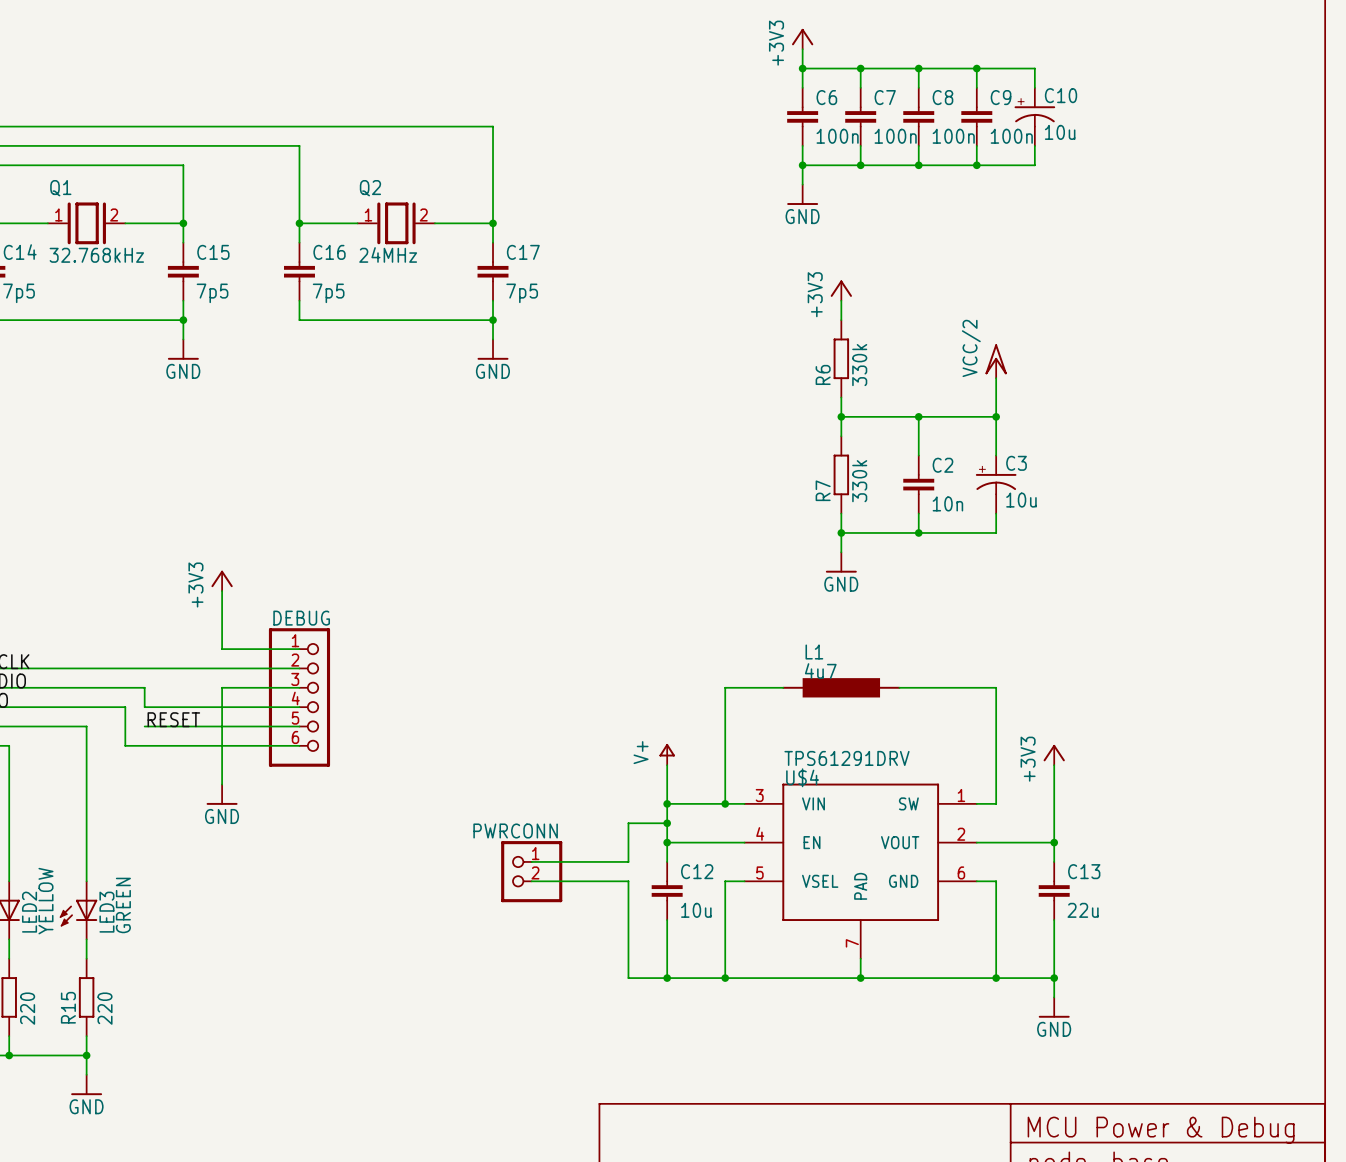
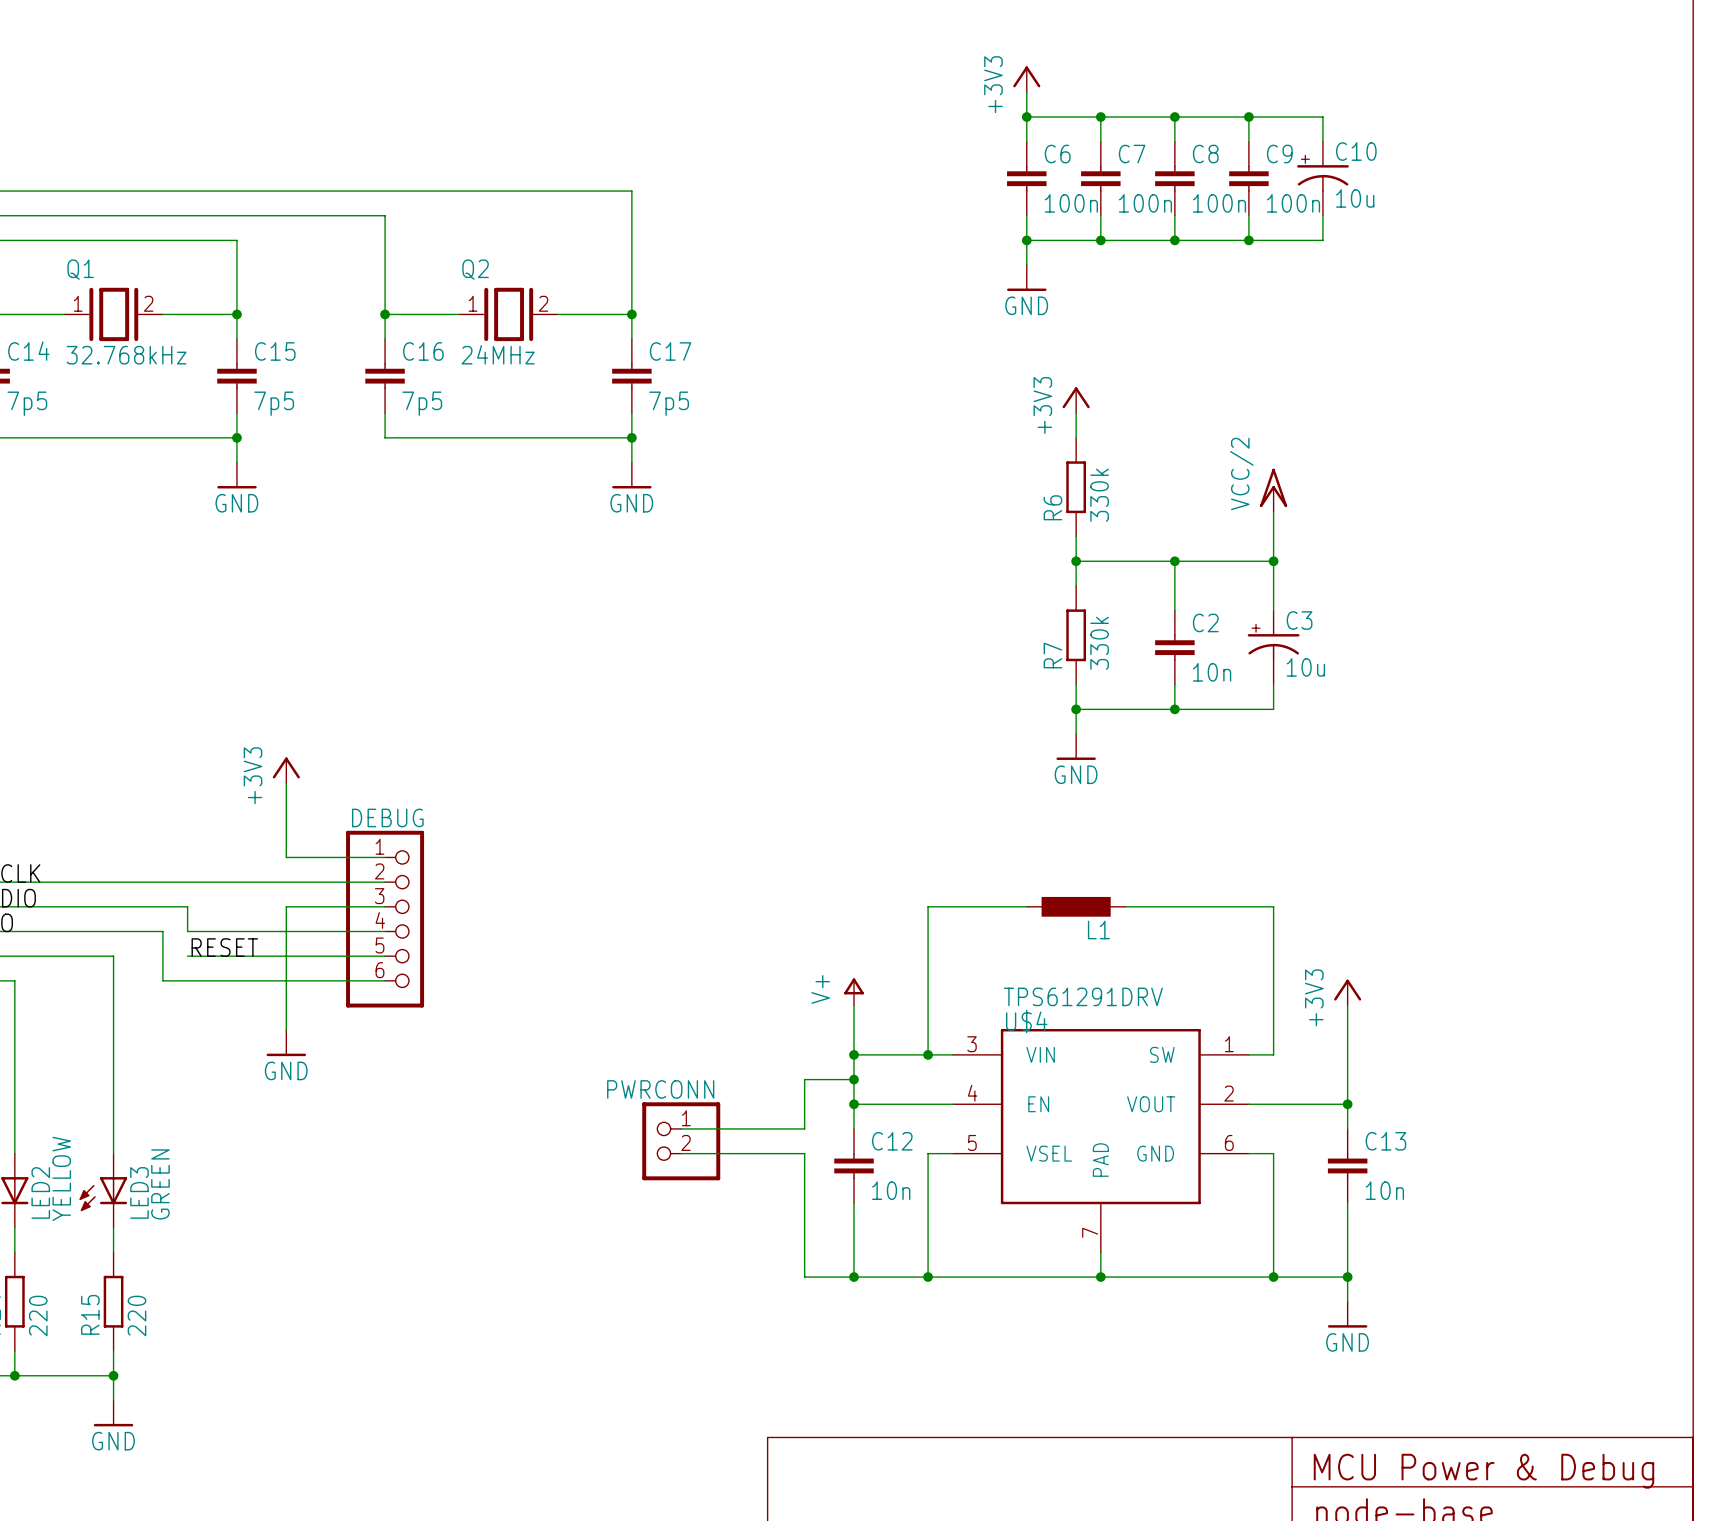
L1 name position: L1 (814, 651) -> L1 (1098, 930)
L1 value: 4u7 (820, 671) -> none
L1 symbol: [782, 678, 901, 698] -> [1026, 896, 1126, 917]
C12 value: 10u (696, 910) -> 10n (891, 1190)
C13 value: 22u (1083, 910) -> 10n (1384, 1190)

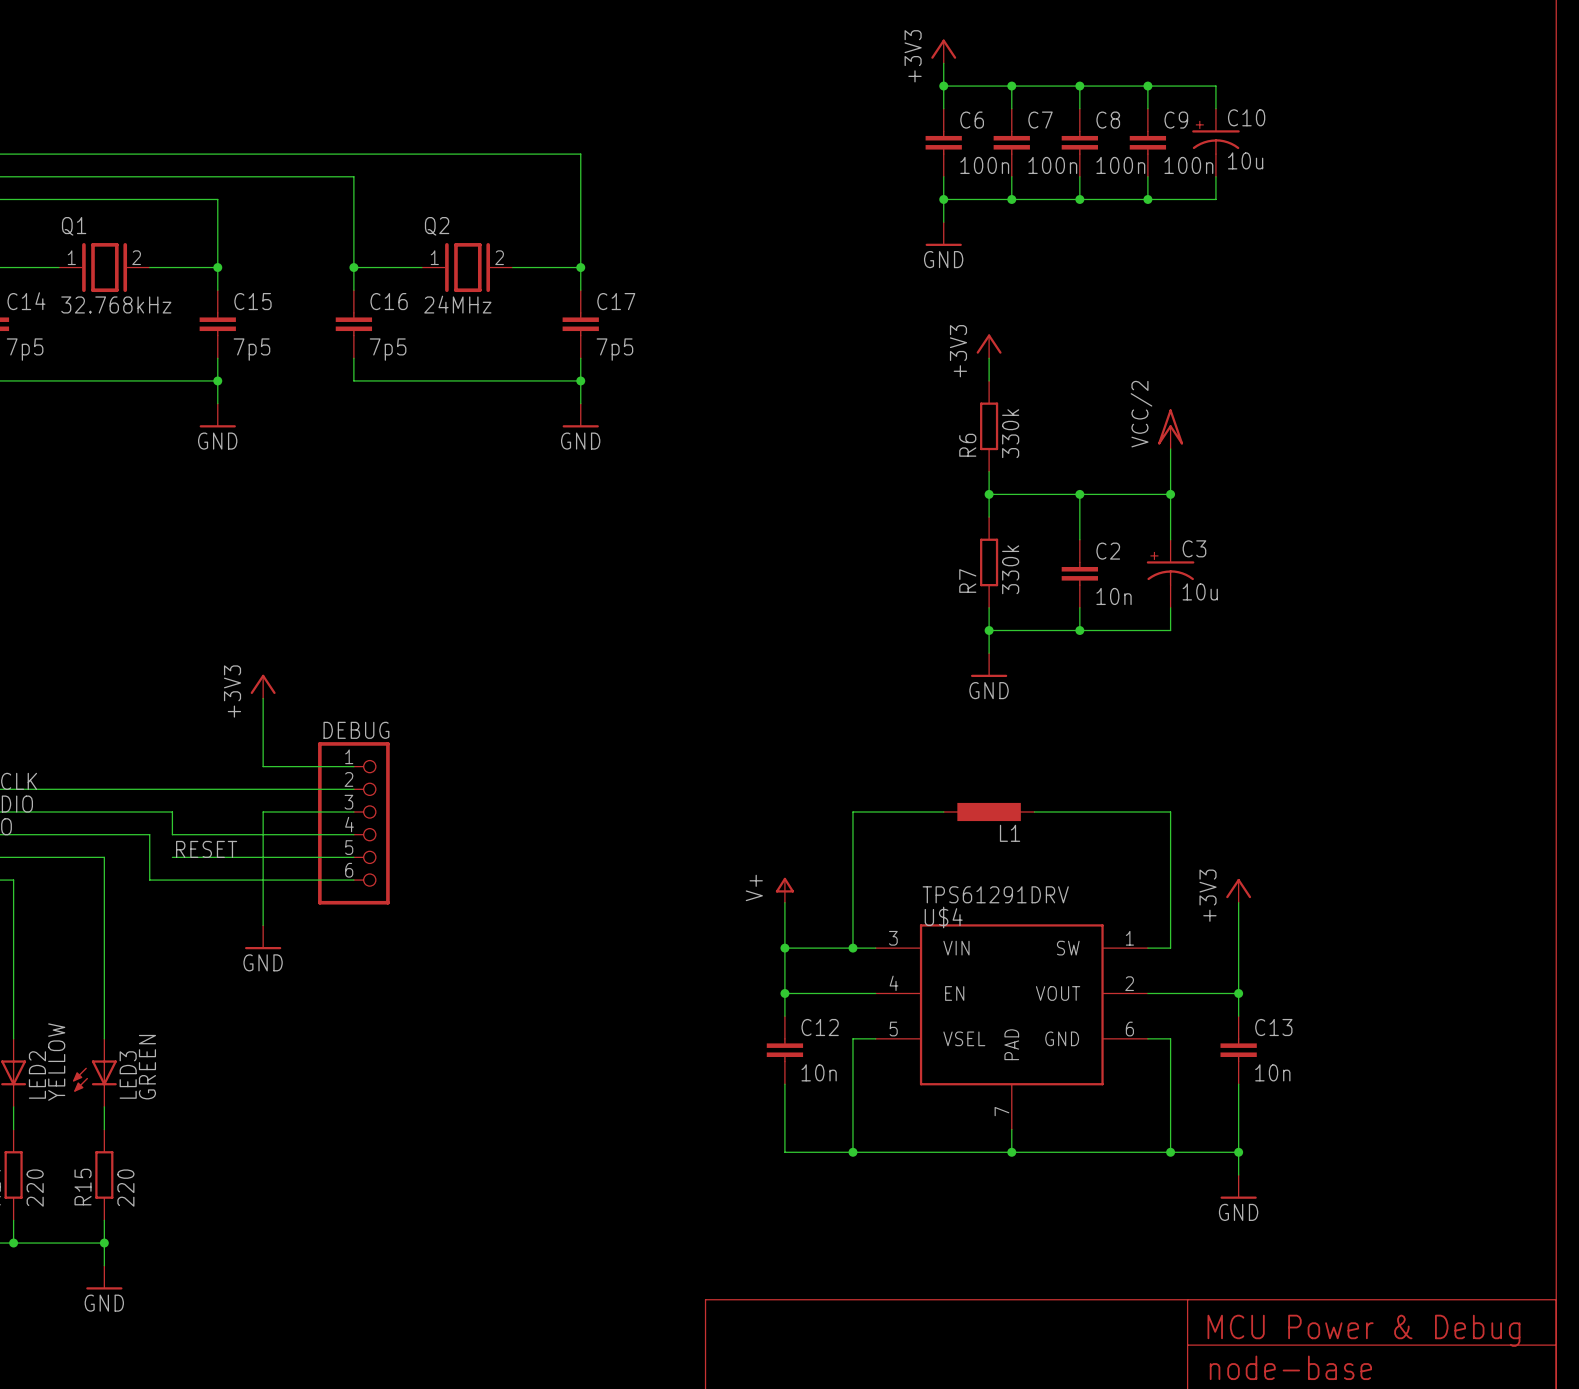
wire: (854, 1079) (804, 1079) (804, 1128) (681, 1128) -> none
junction: (854, 1079) -> none
PWRCONN: (681, 1141) -> none
wire: (681, 1153) (804, 1153) (804, 1277) (854, 1277) -> none
junction: (854, 1277) -> none

